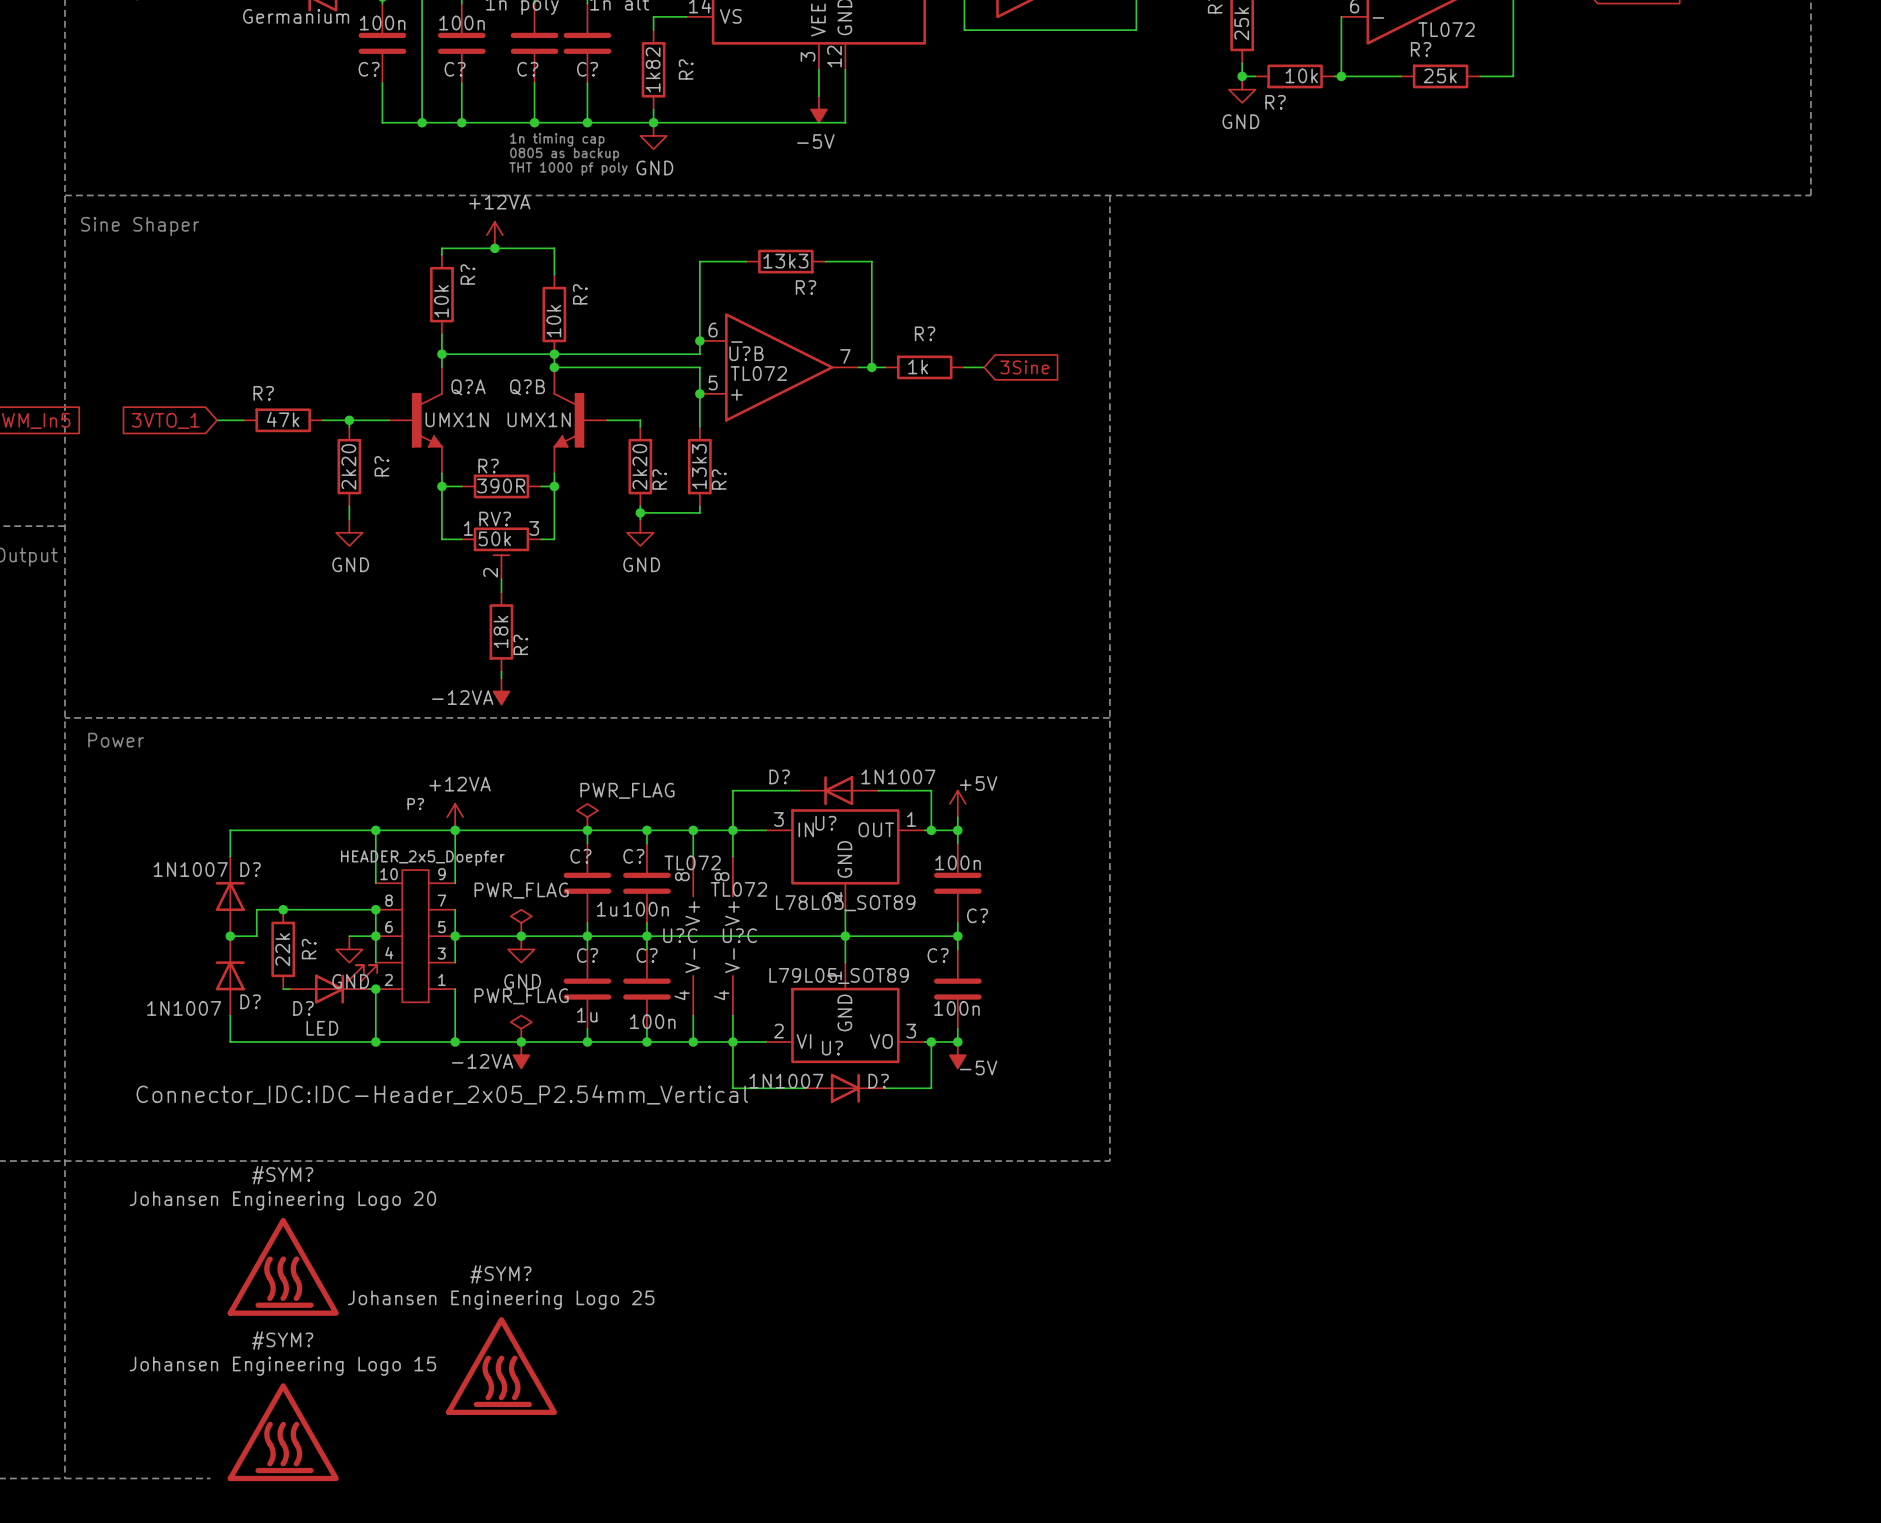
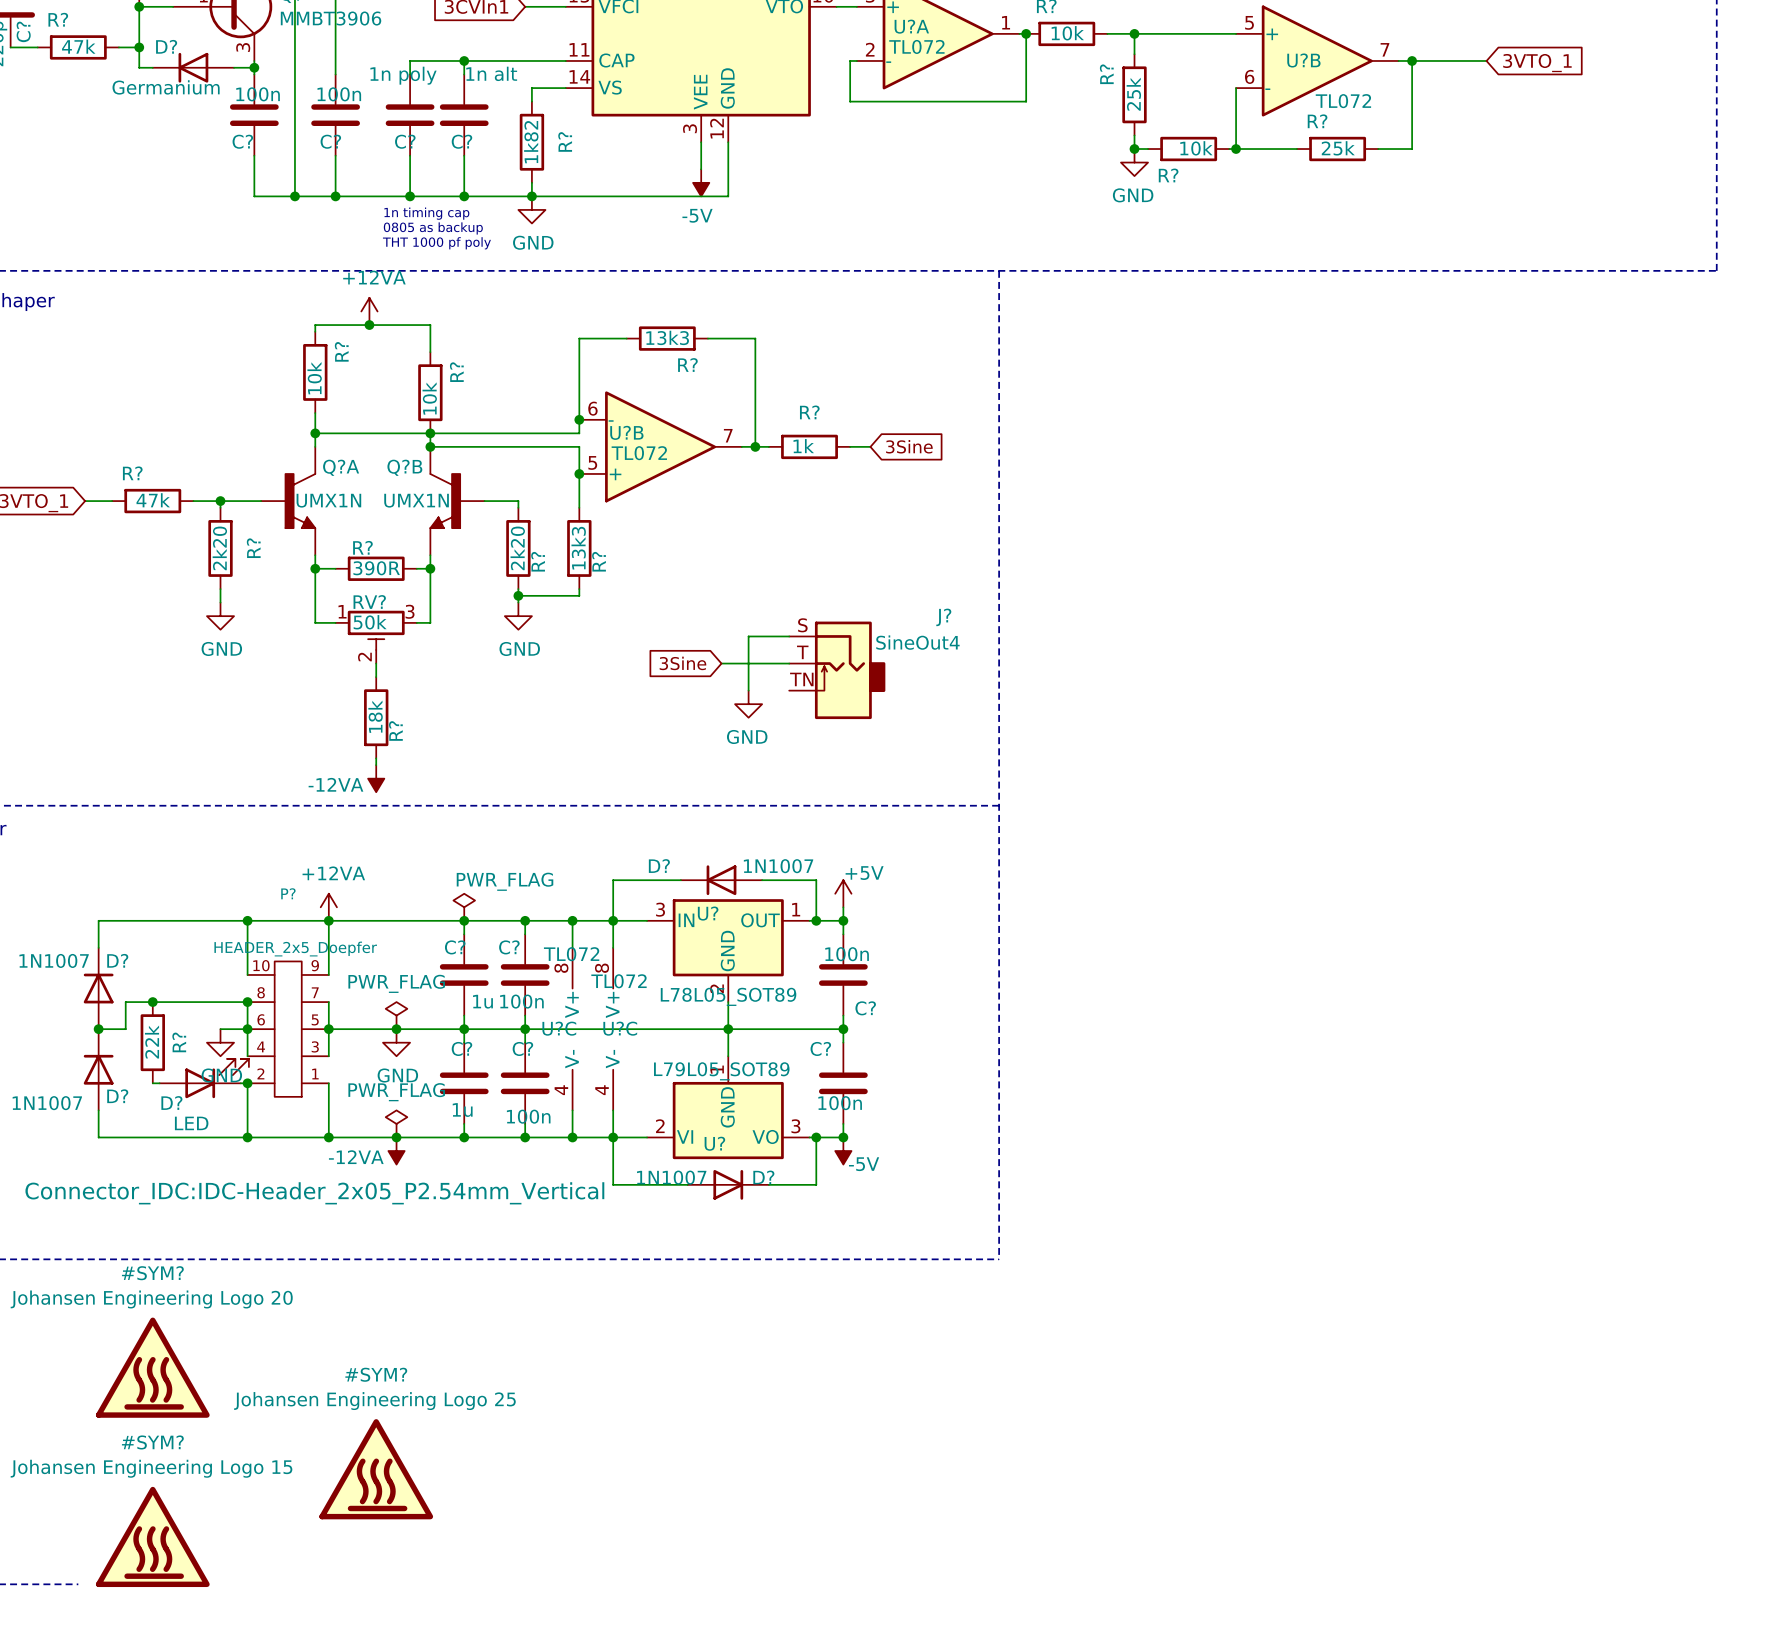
wire: none -> (789, 636) (748, 636) (748, 690)
global label: none -> 3Sine (682, 663)
wire: none -> (721, 663) (789, 663)
J?: none -> SineOut4 (837, 670)
power symbol: none -> GND (748, 704)

